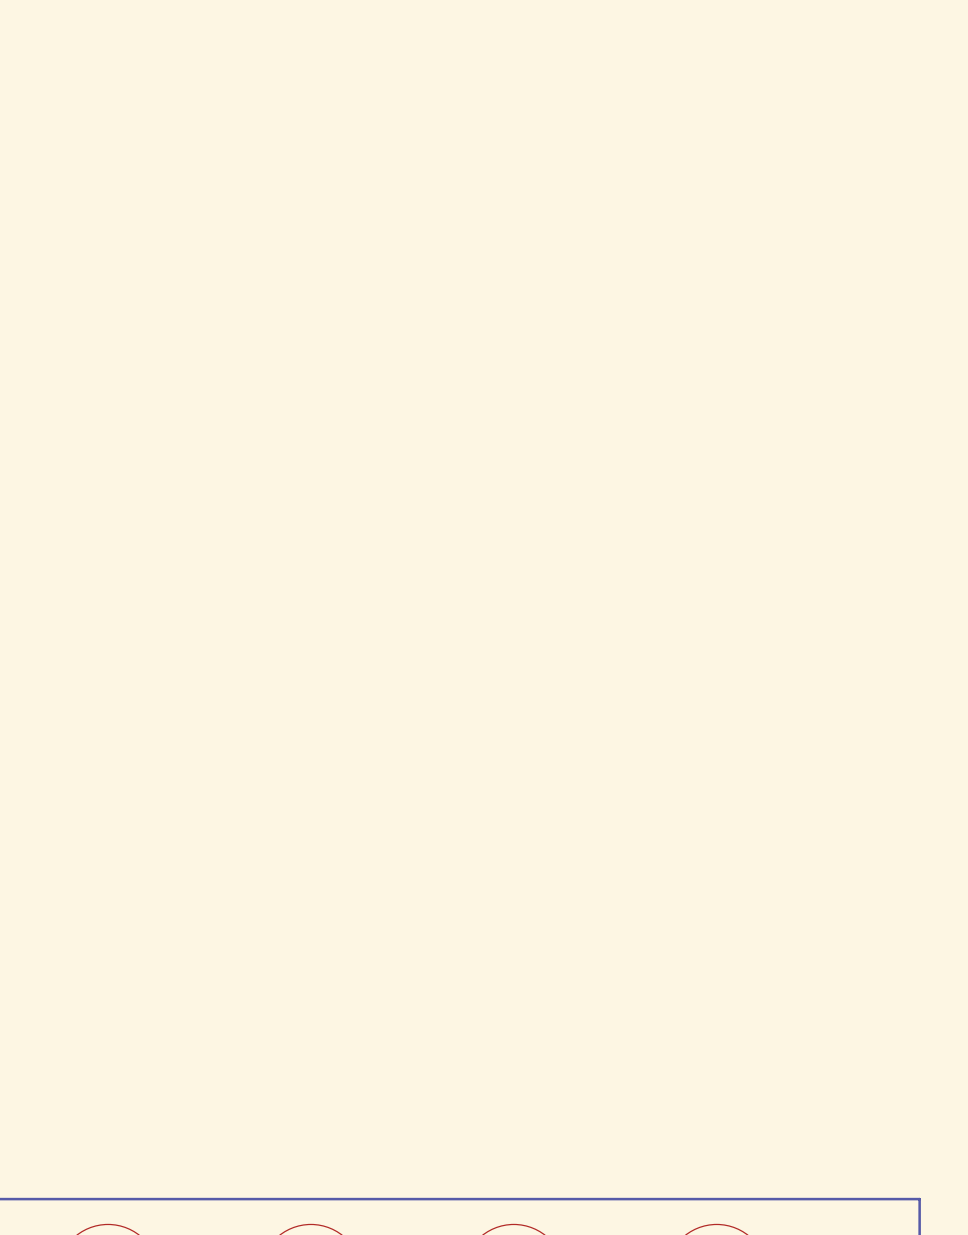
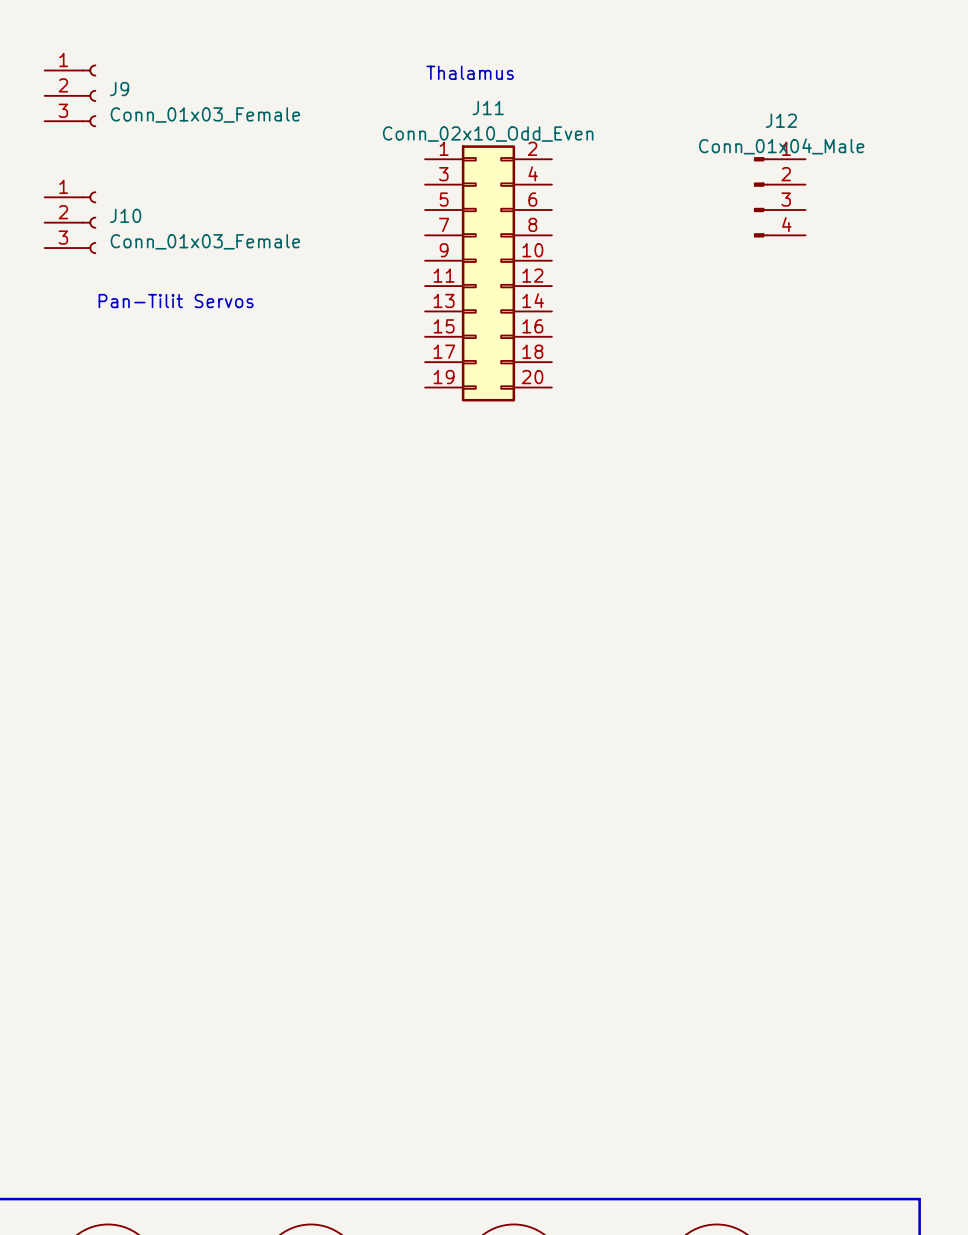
text: none -> Thalamus (470, 72)
J9: none -> Conn_01x03_Female (70, 95)
J12: none -> Conn_01x04_Male (779, 197)
J10: none -> Conn_01x03_Female (70, 222)
J11: none -> Conn_02x10_Odd_Even (488, 273)
text: none -> Pan-Tilit Servos (176, 301)

